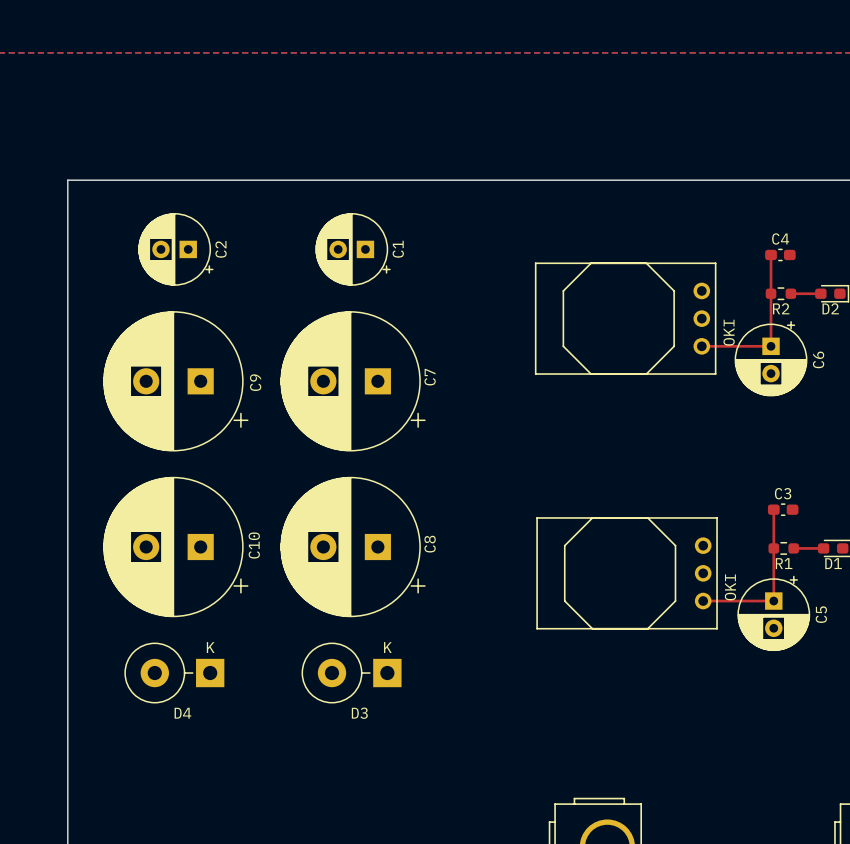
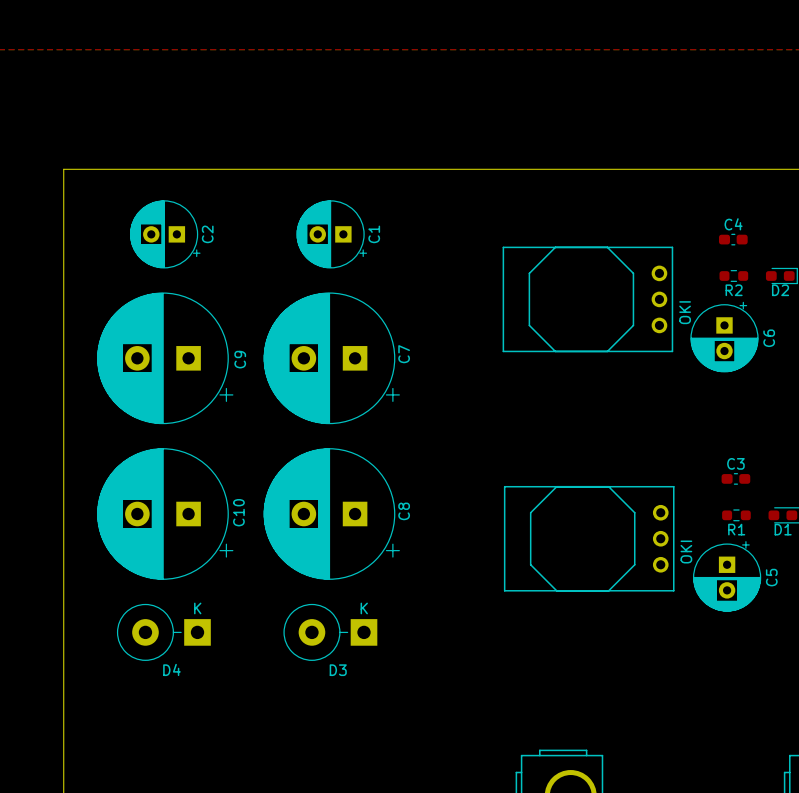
top track: (771, 254) (771, 346) (701, 346) -> none
top track: (790, 293) (820, 293) -> none
top track: (773, 509) (773, 601) (703, 601) -> none
top track: (793, 548) (823, 548) -> none

